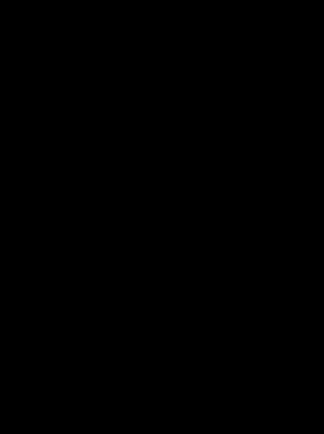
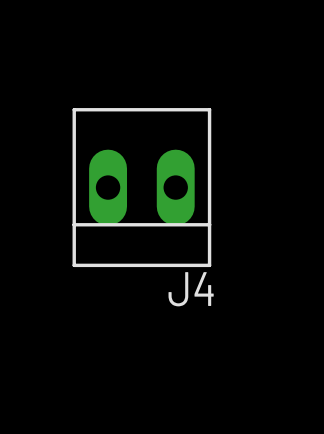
J4: none -> (141, 187)

